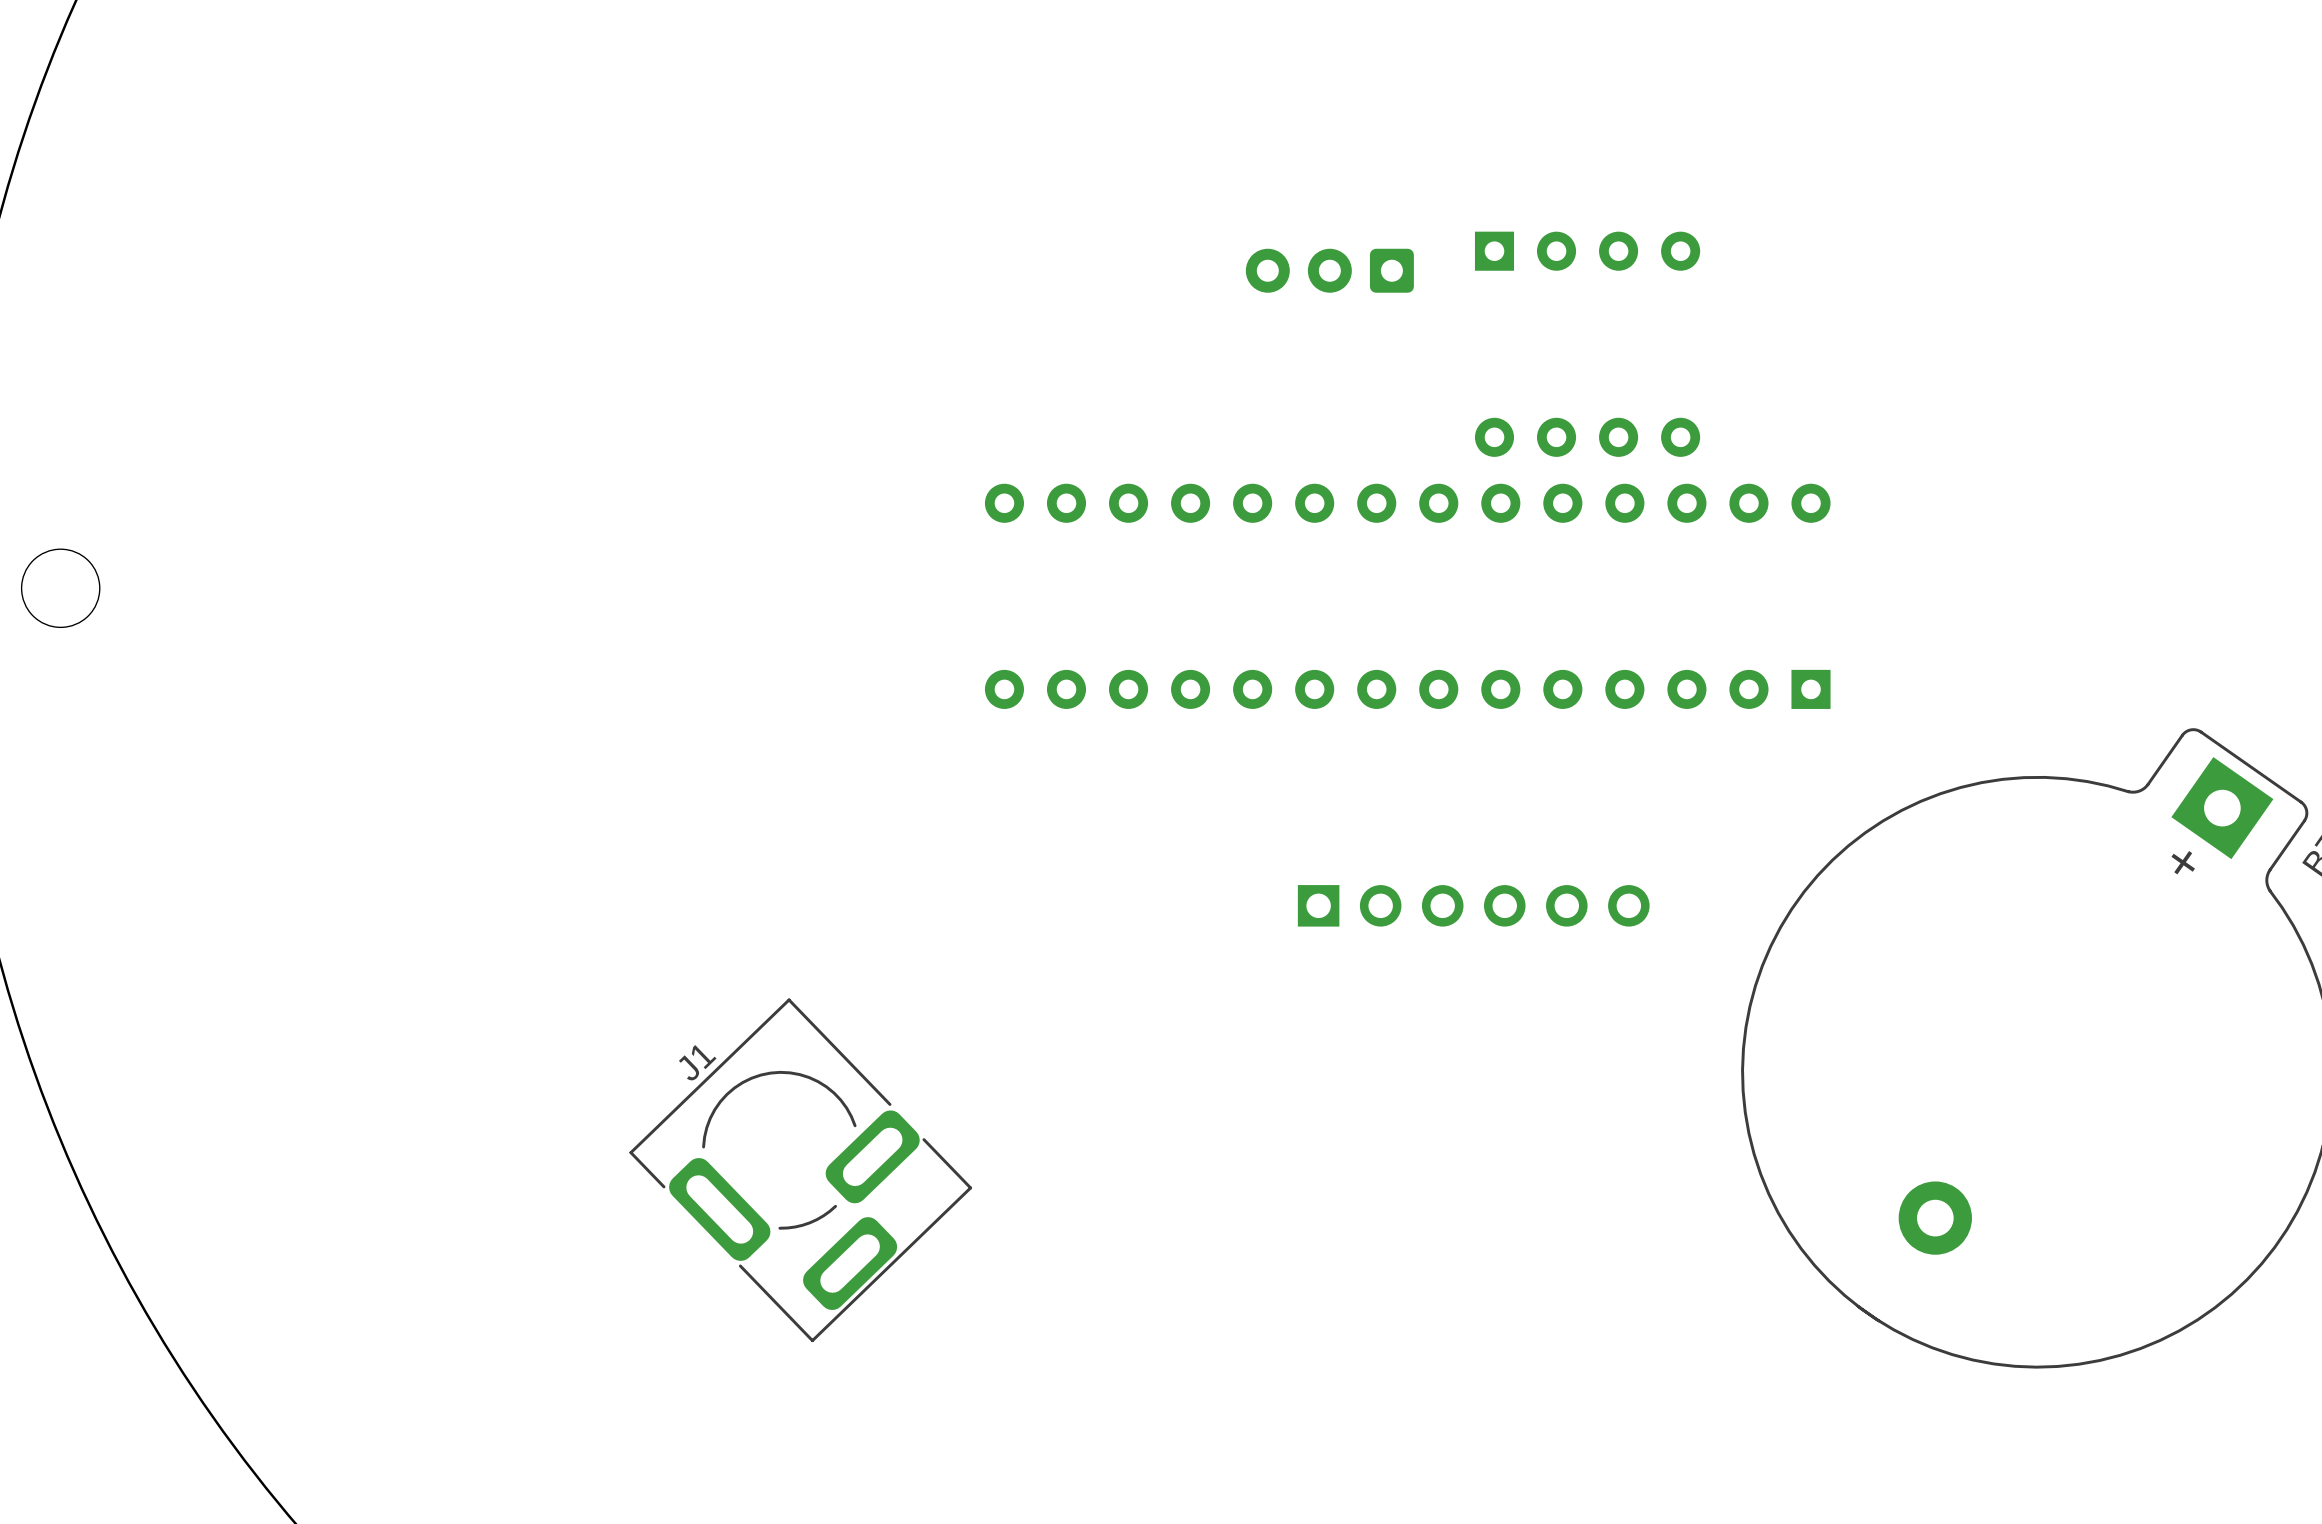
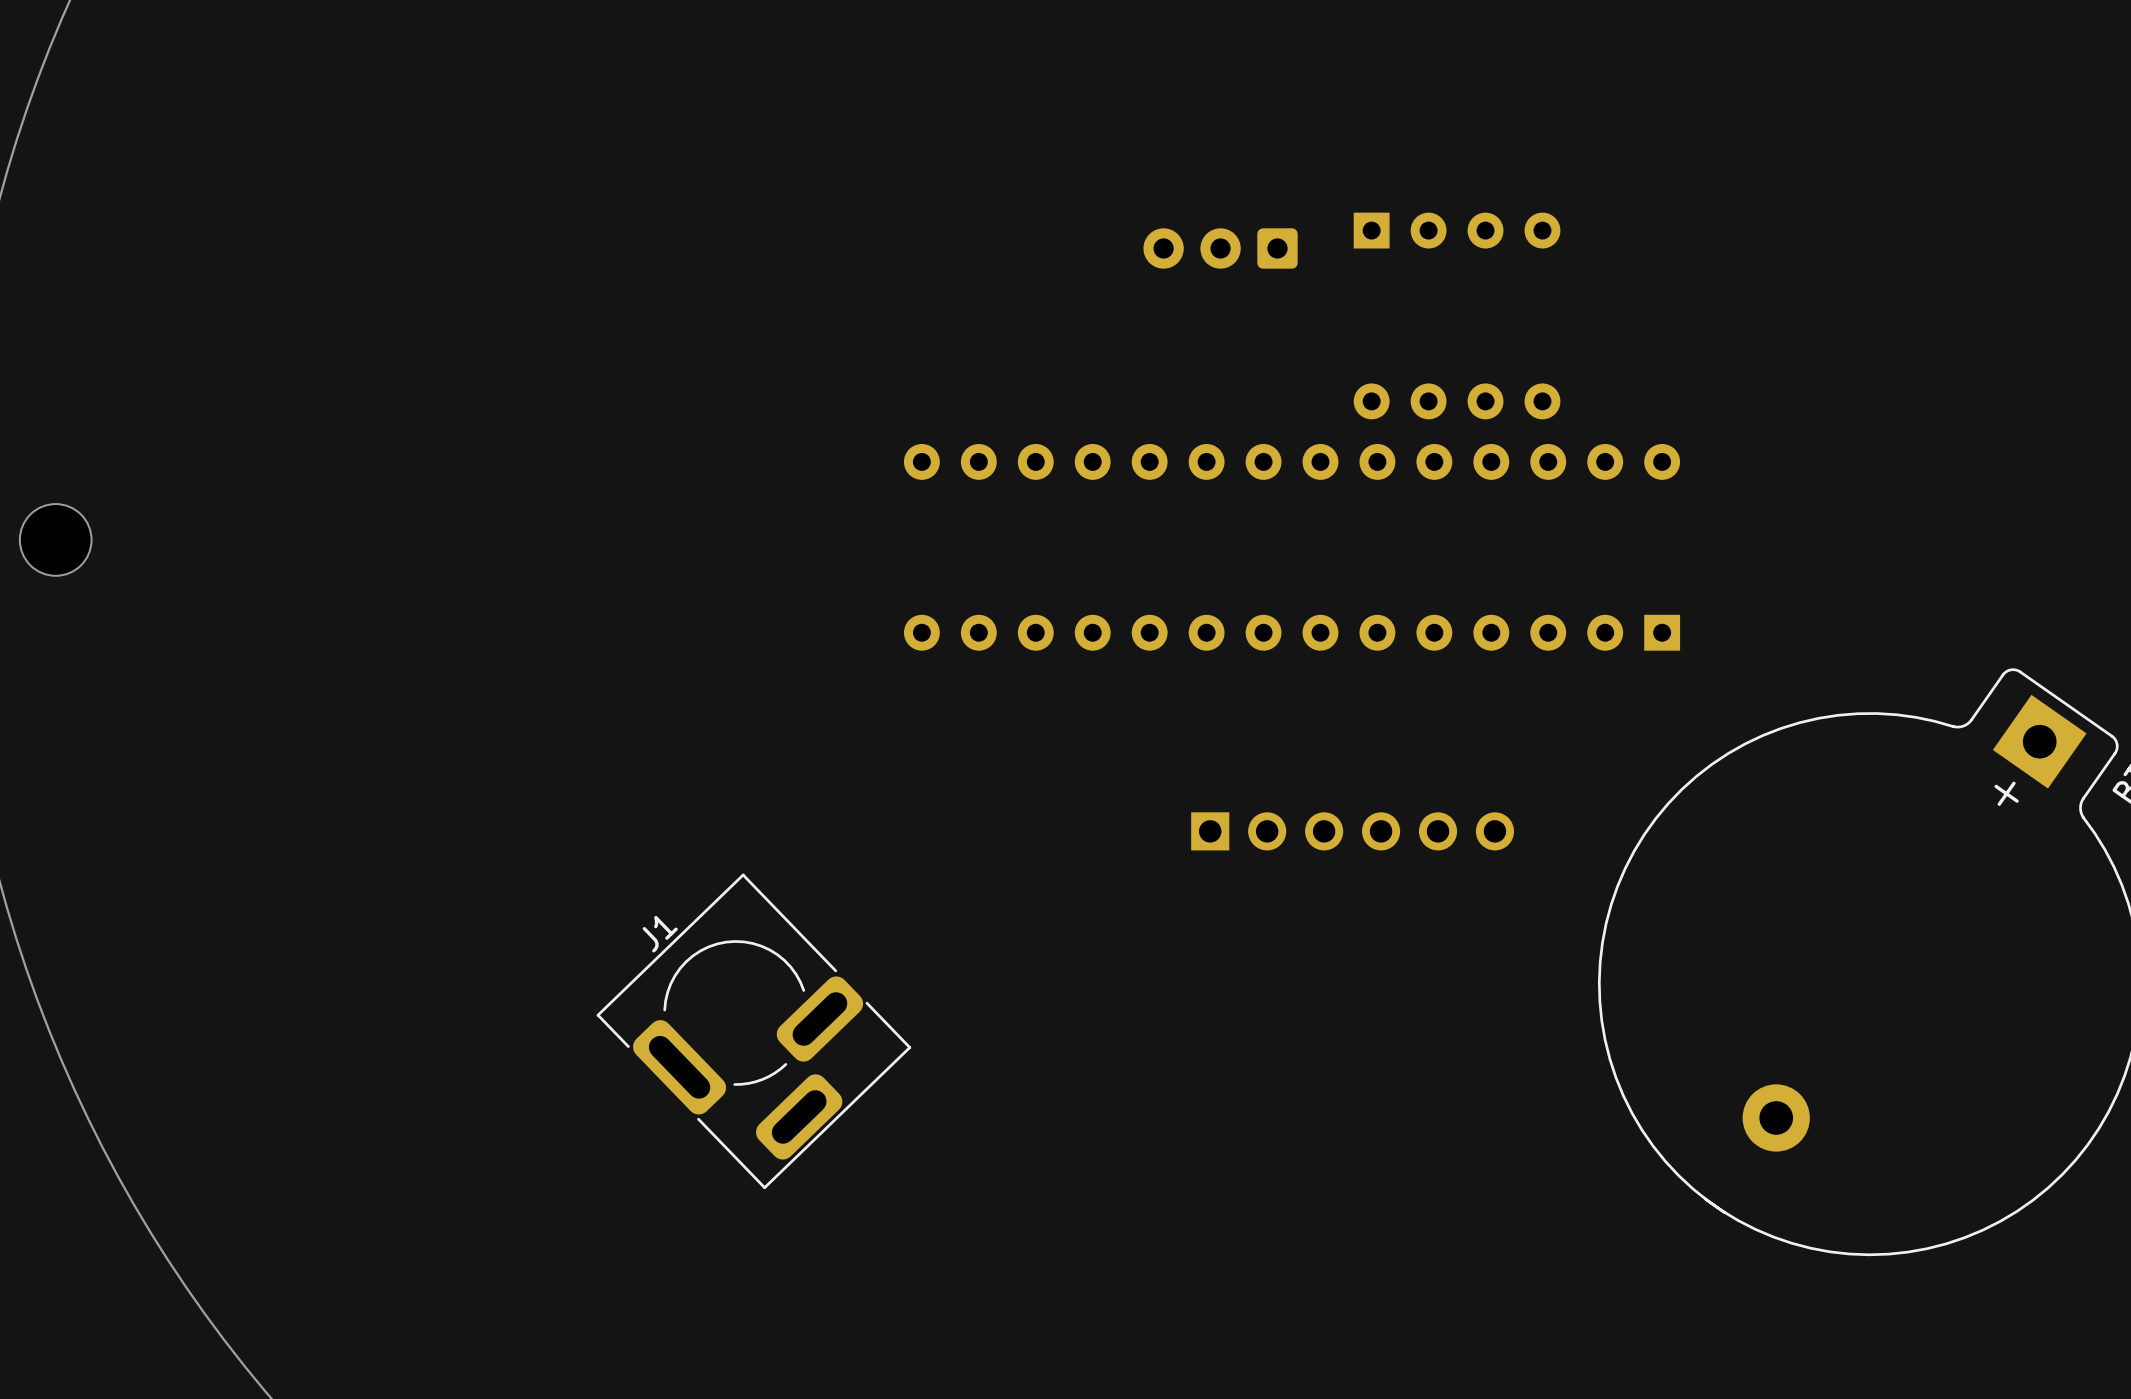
J1 position: (800, 1170) -> (753, 1031)

